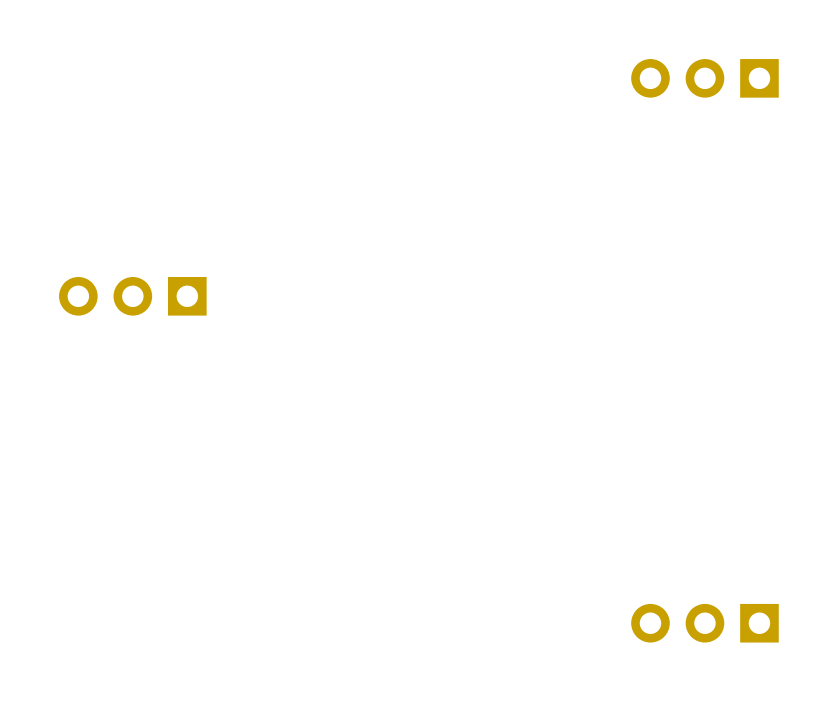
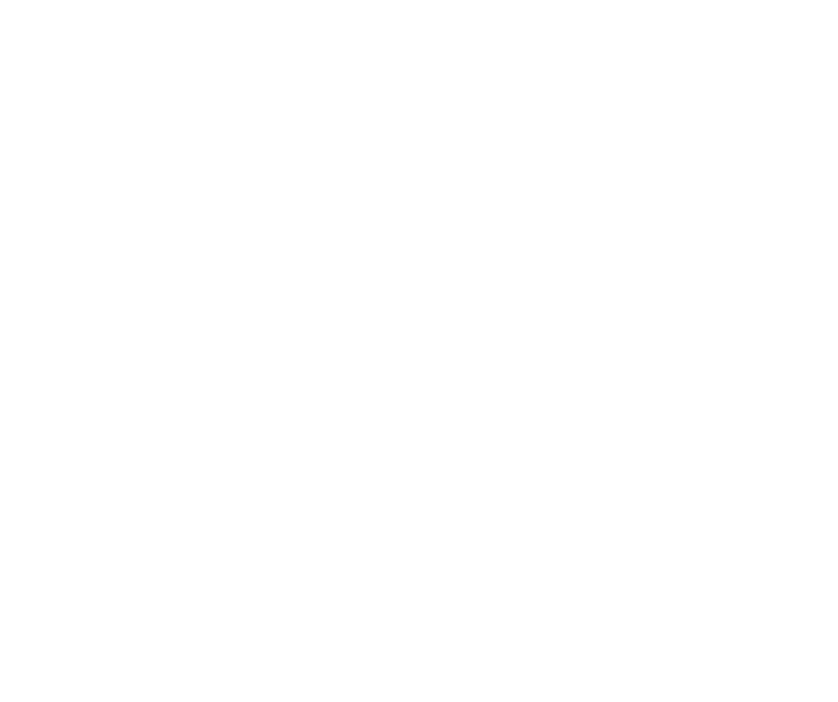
part: (704, 78) -> none
part: (132, 296) -> none
part: (704, 623) -> none

